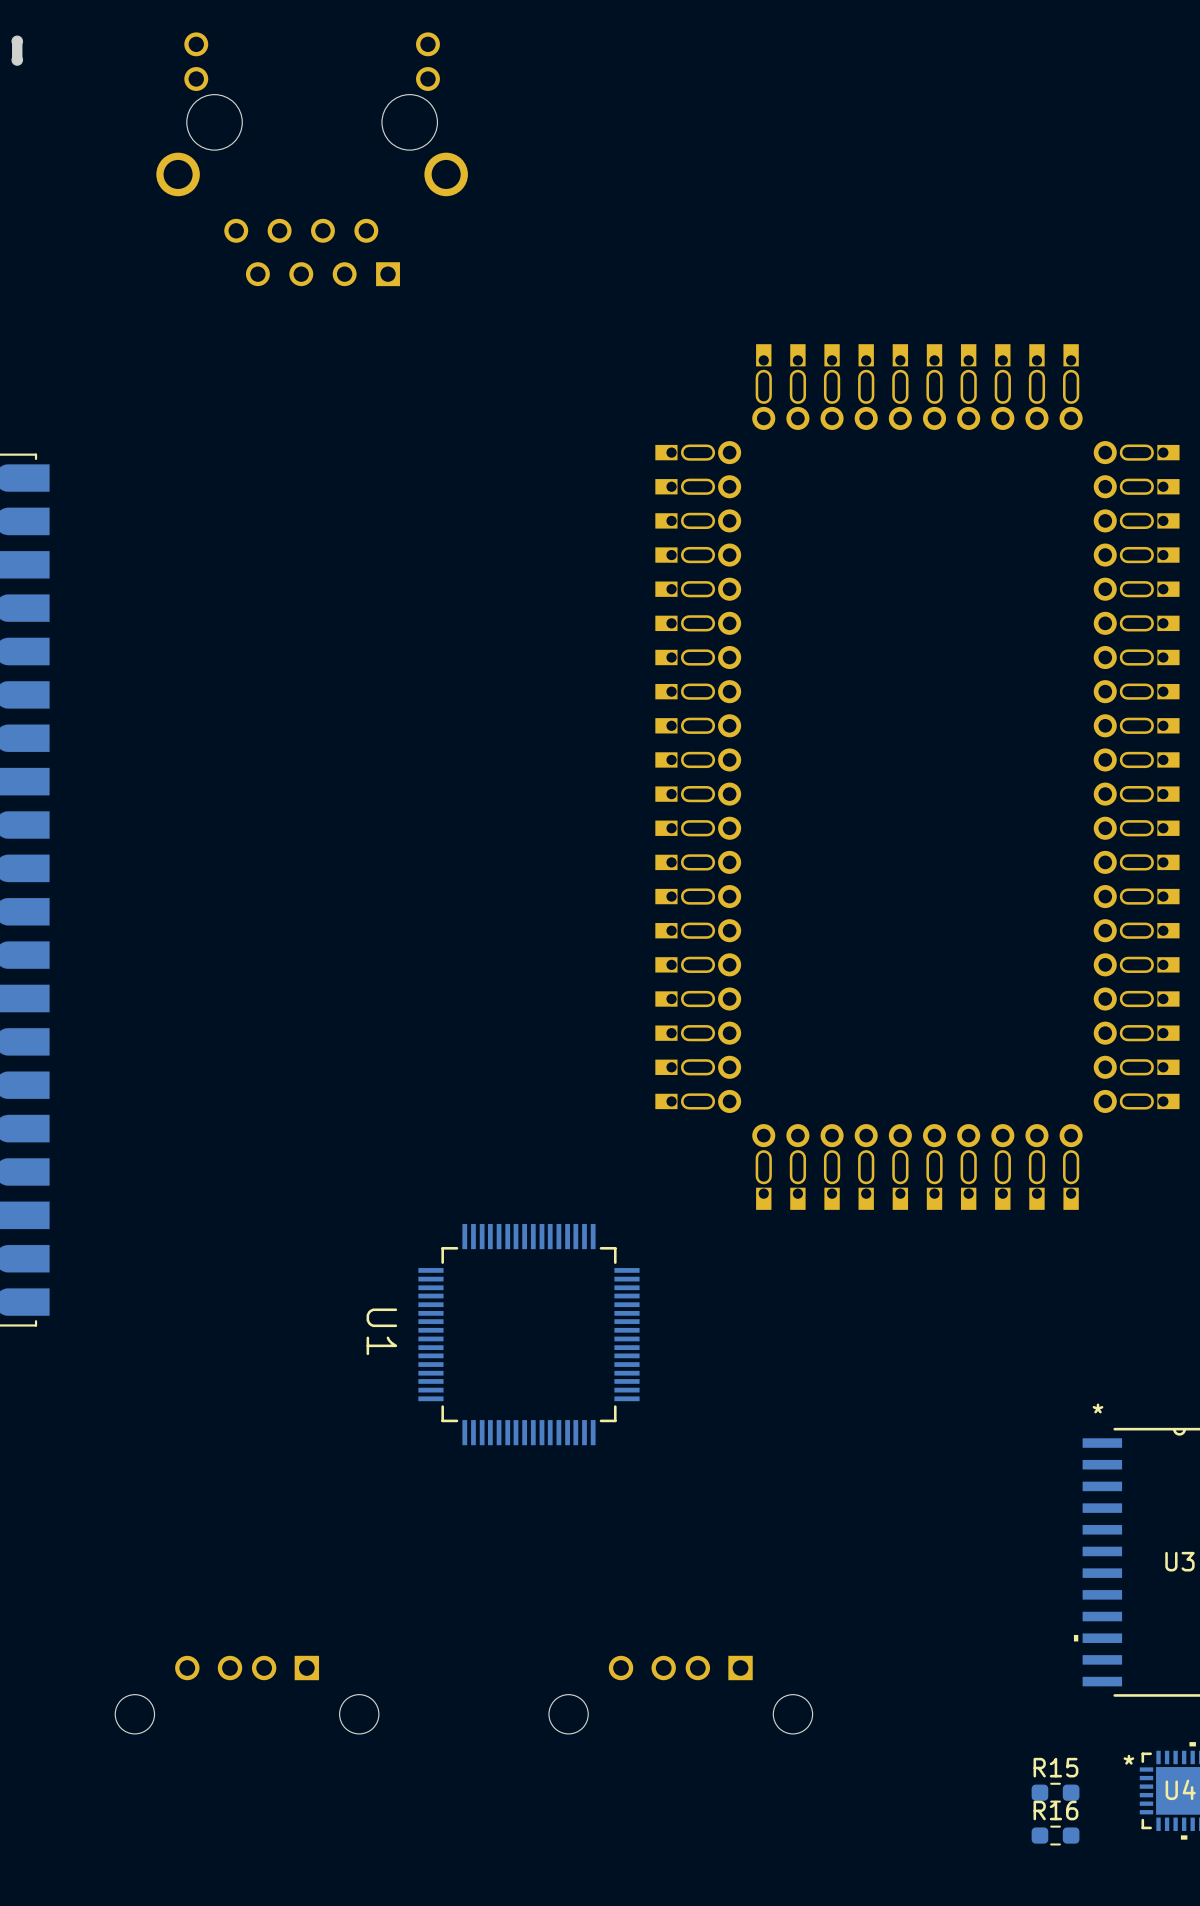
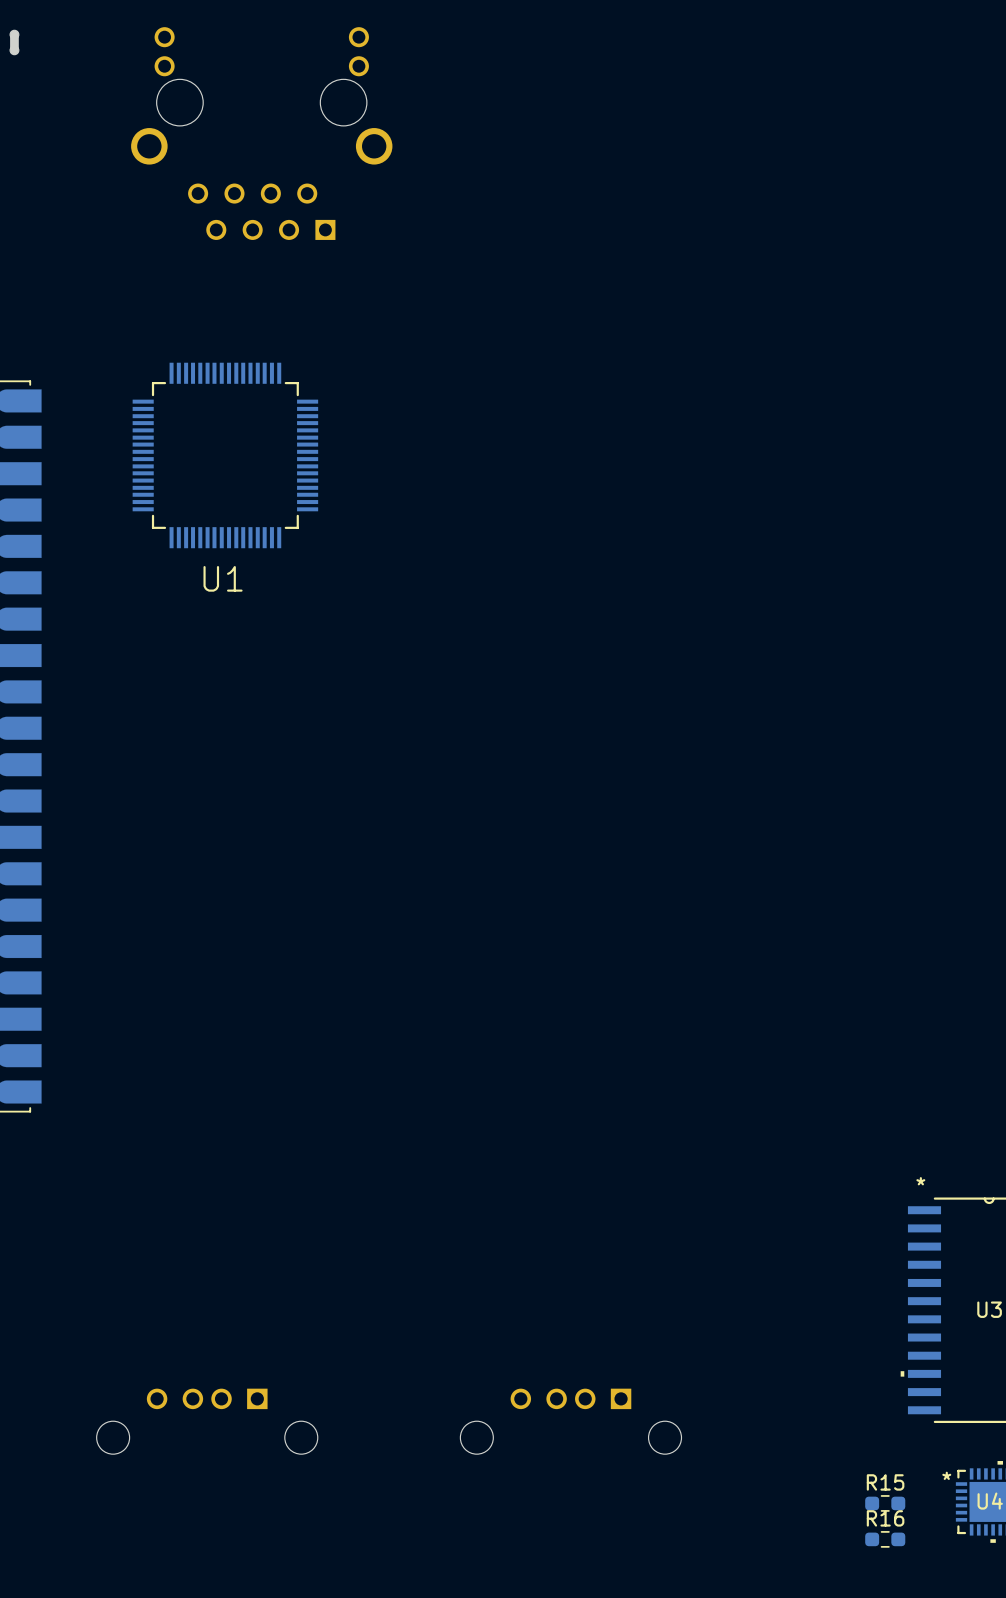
part: (917, 777) -> none
U1 name rotation: 0° (381, 1331) -> 90° counterclockwise (223, 578)
U1 name position: U1 (381, 1331) -> U1 (223, 578)
U1 position: (528, 1334) -> (225, 455)

